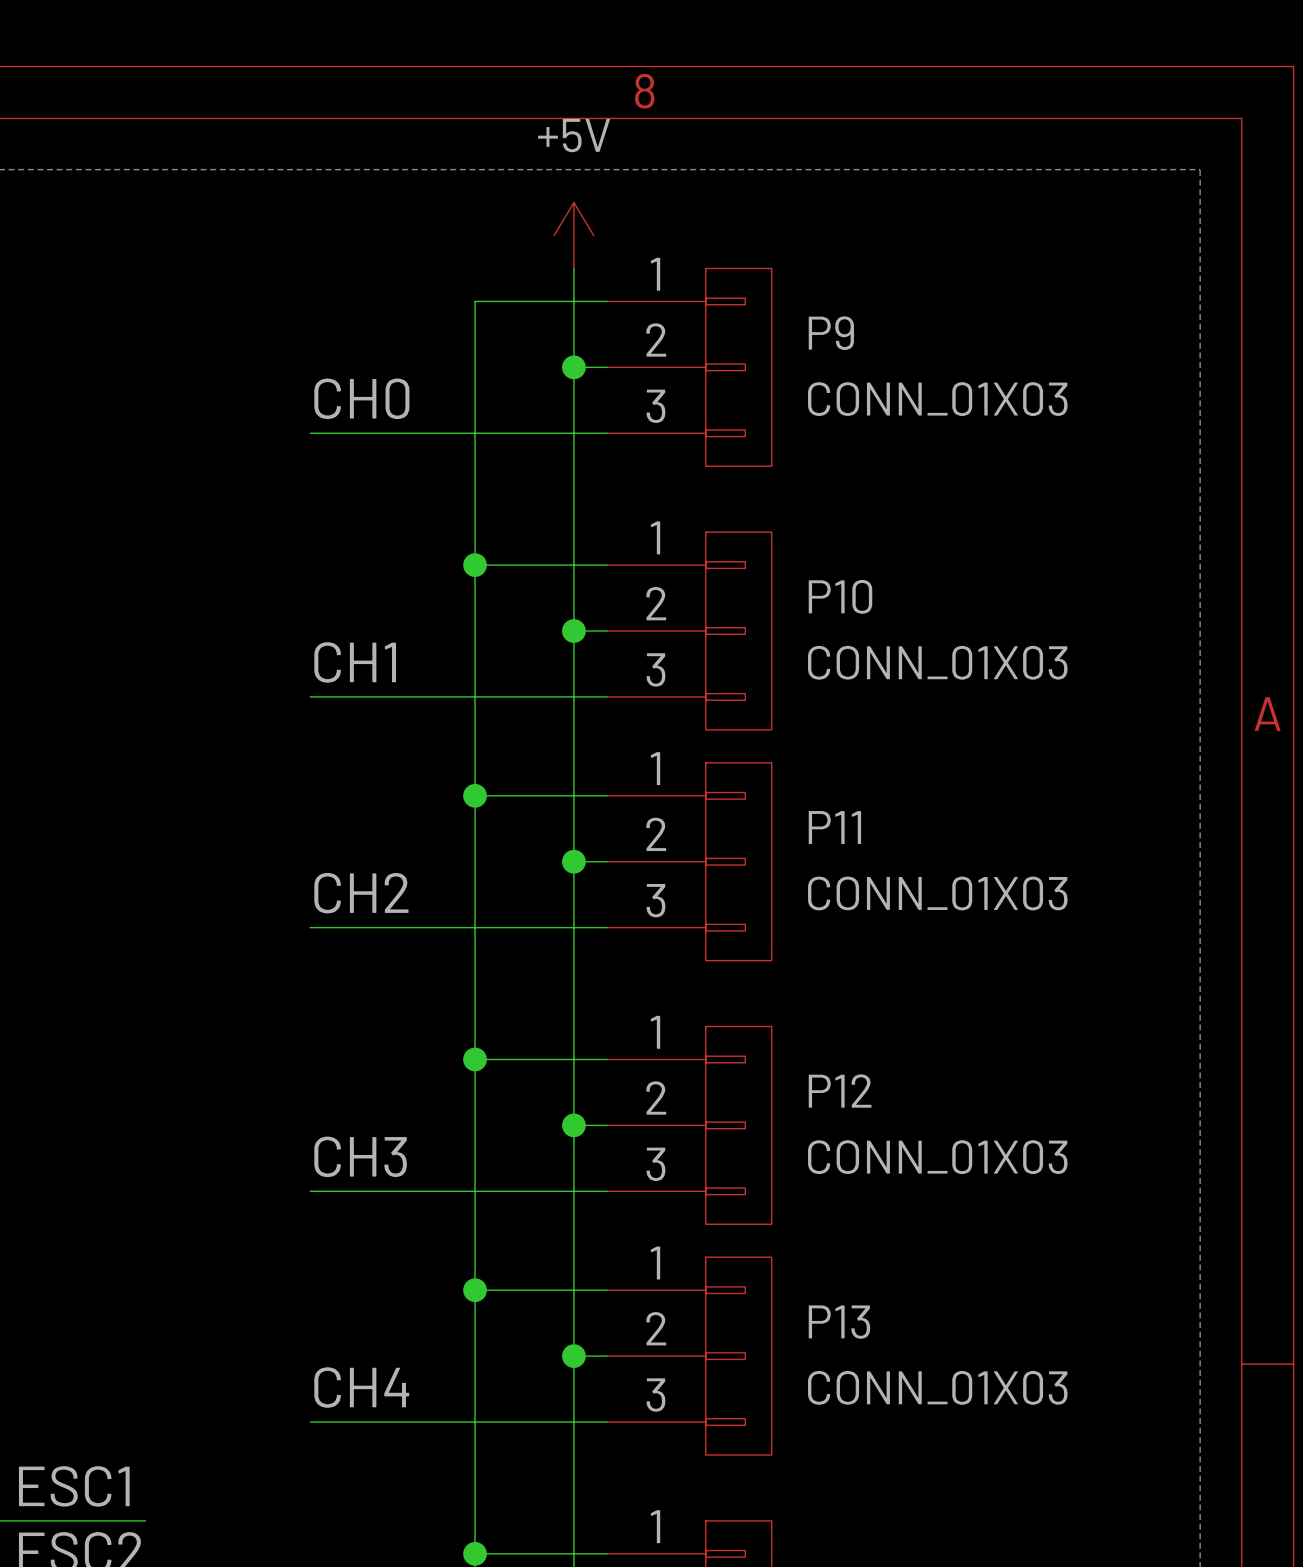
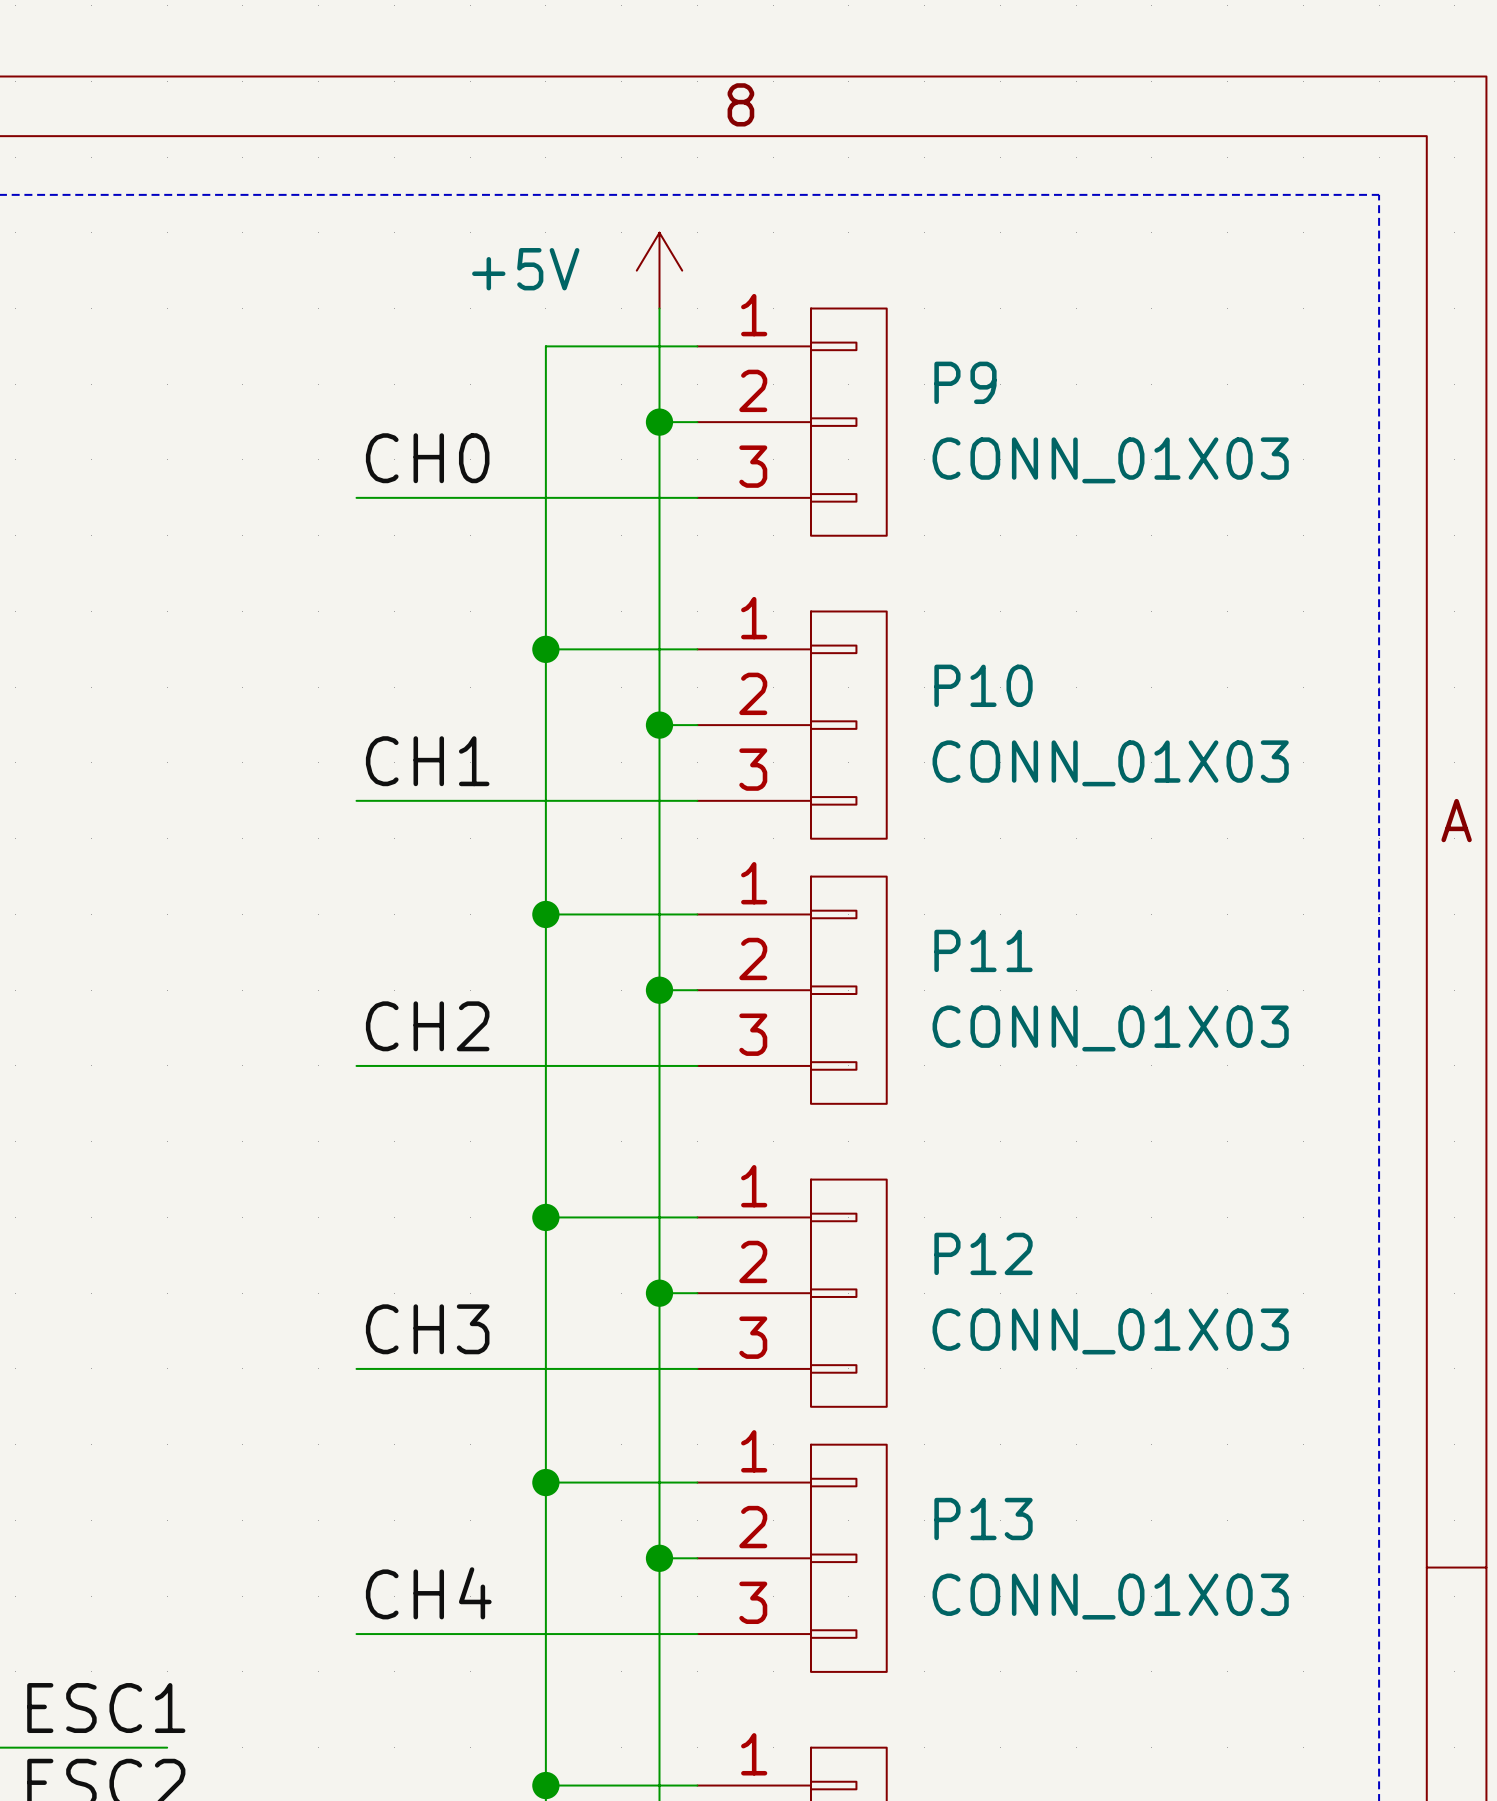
power symbol text position: +5V (574, 135) -> +5V (525, 269)

